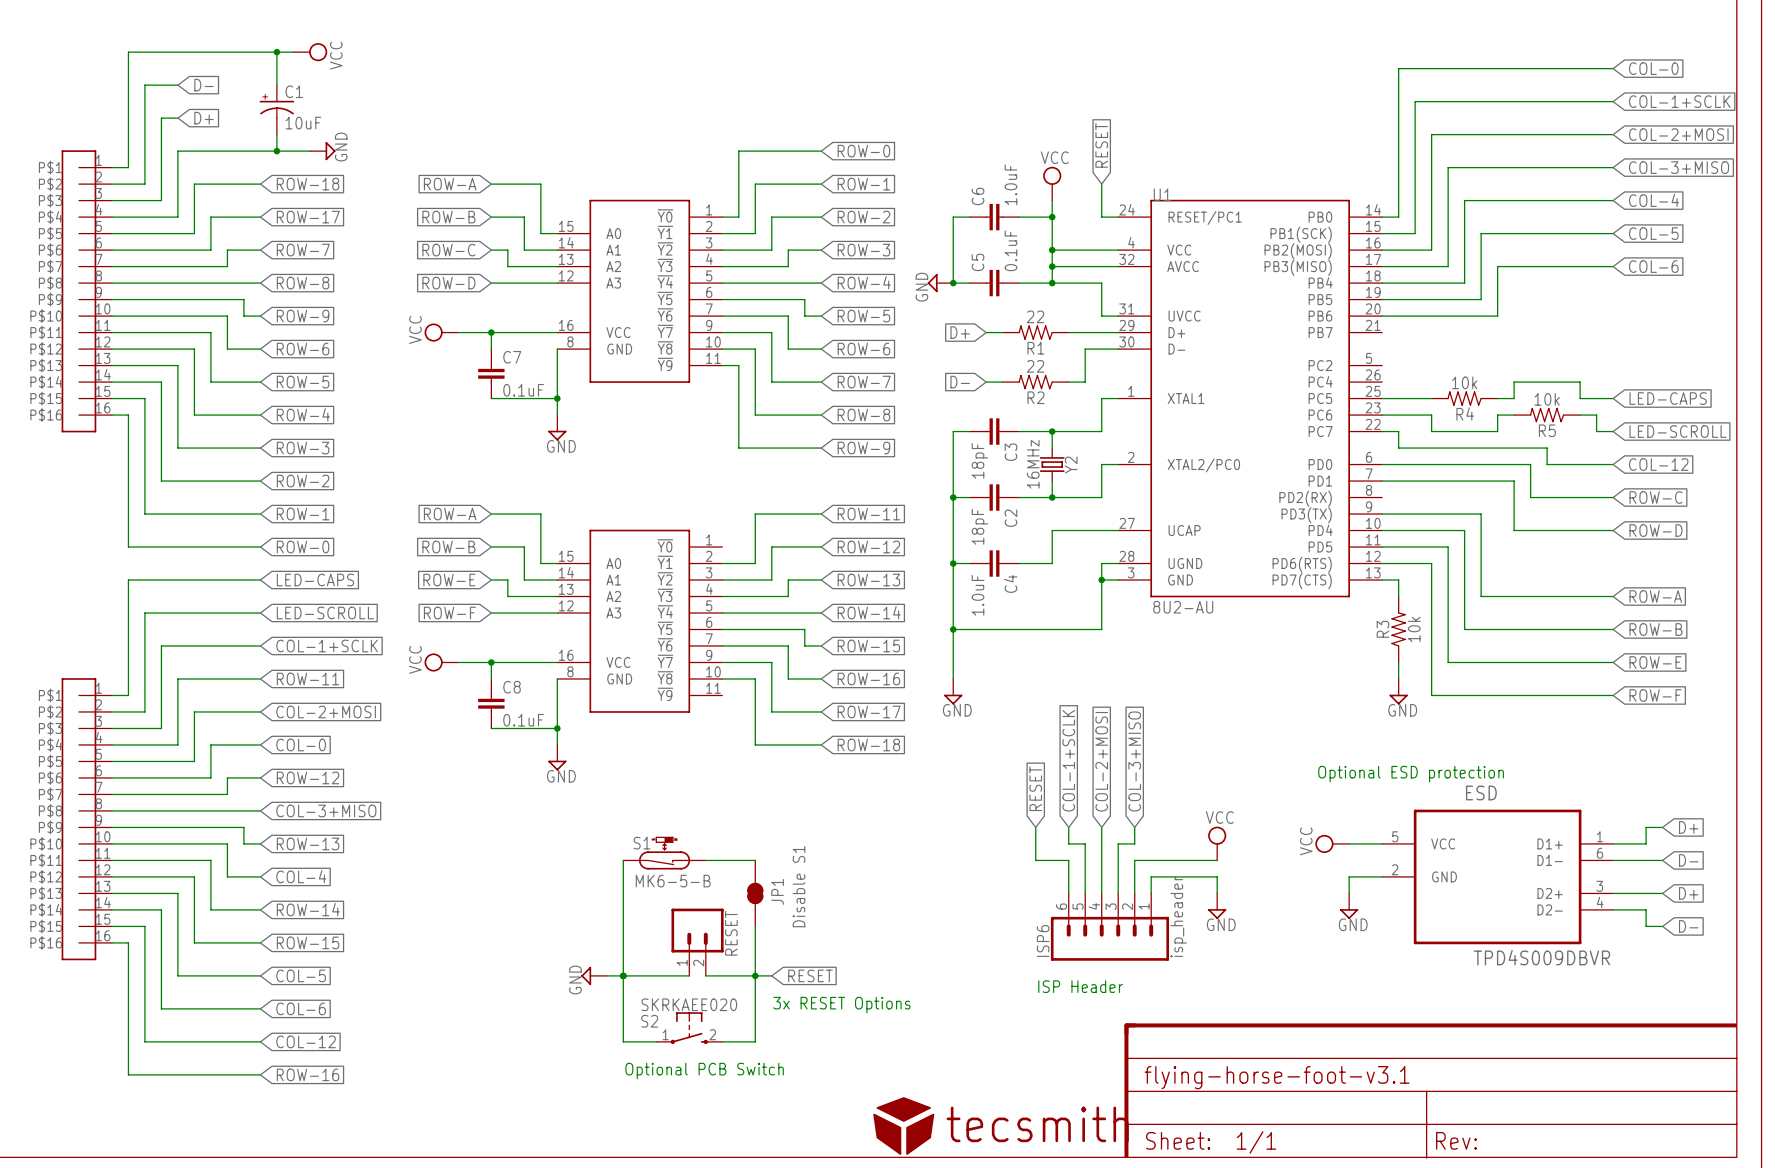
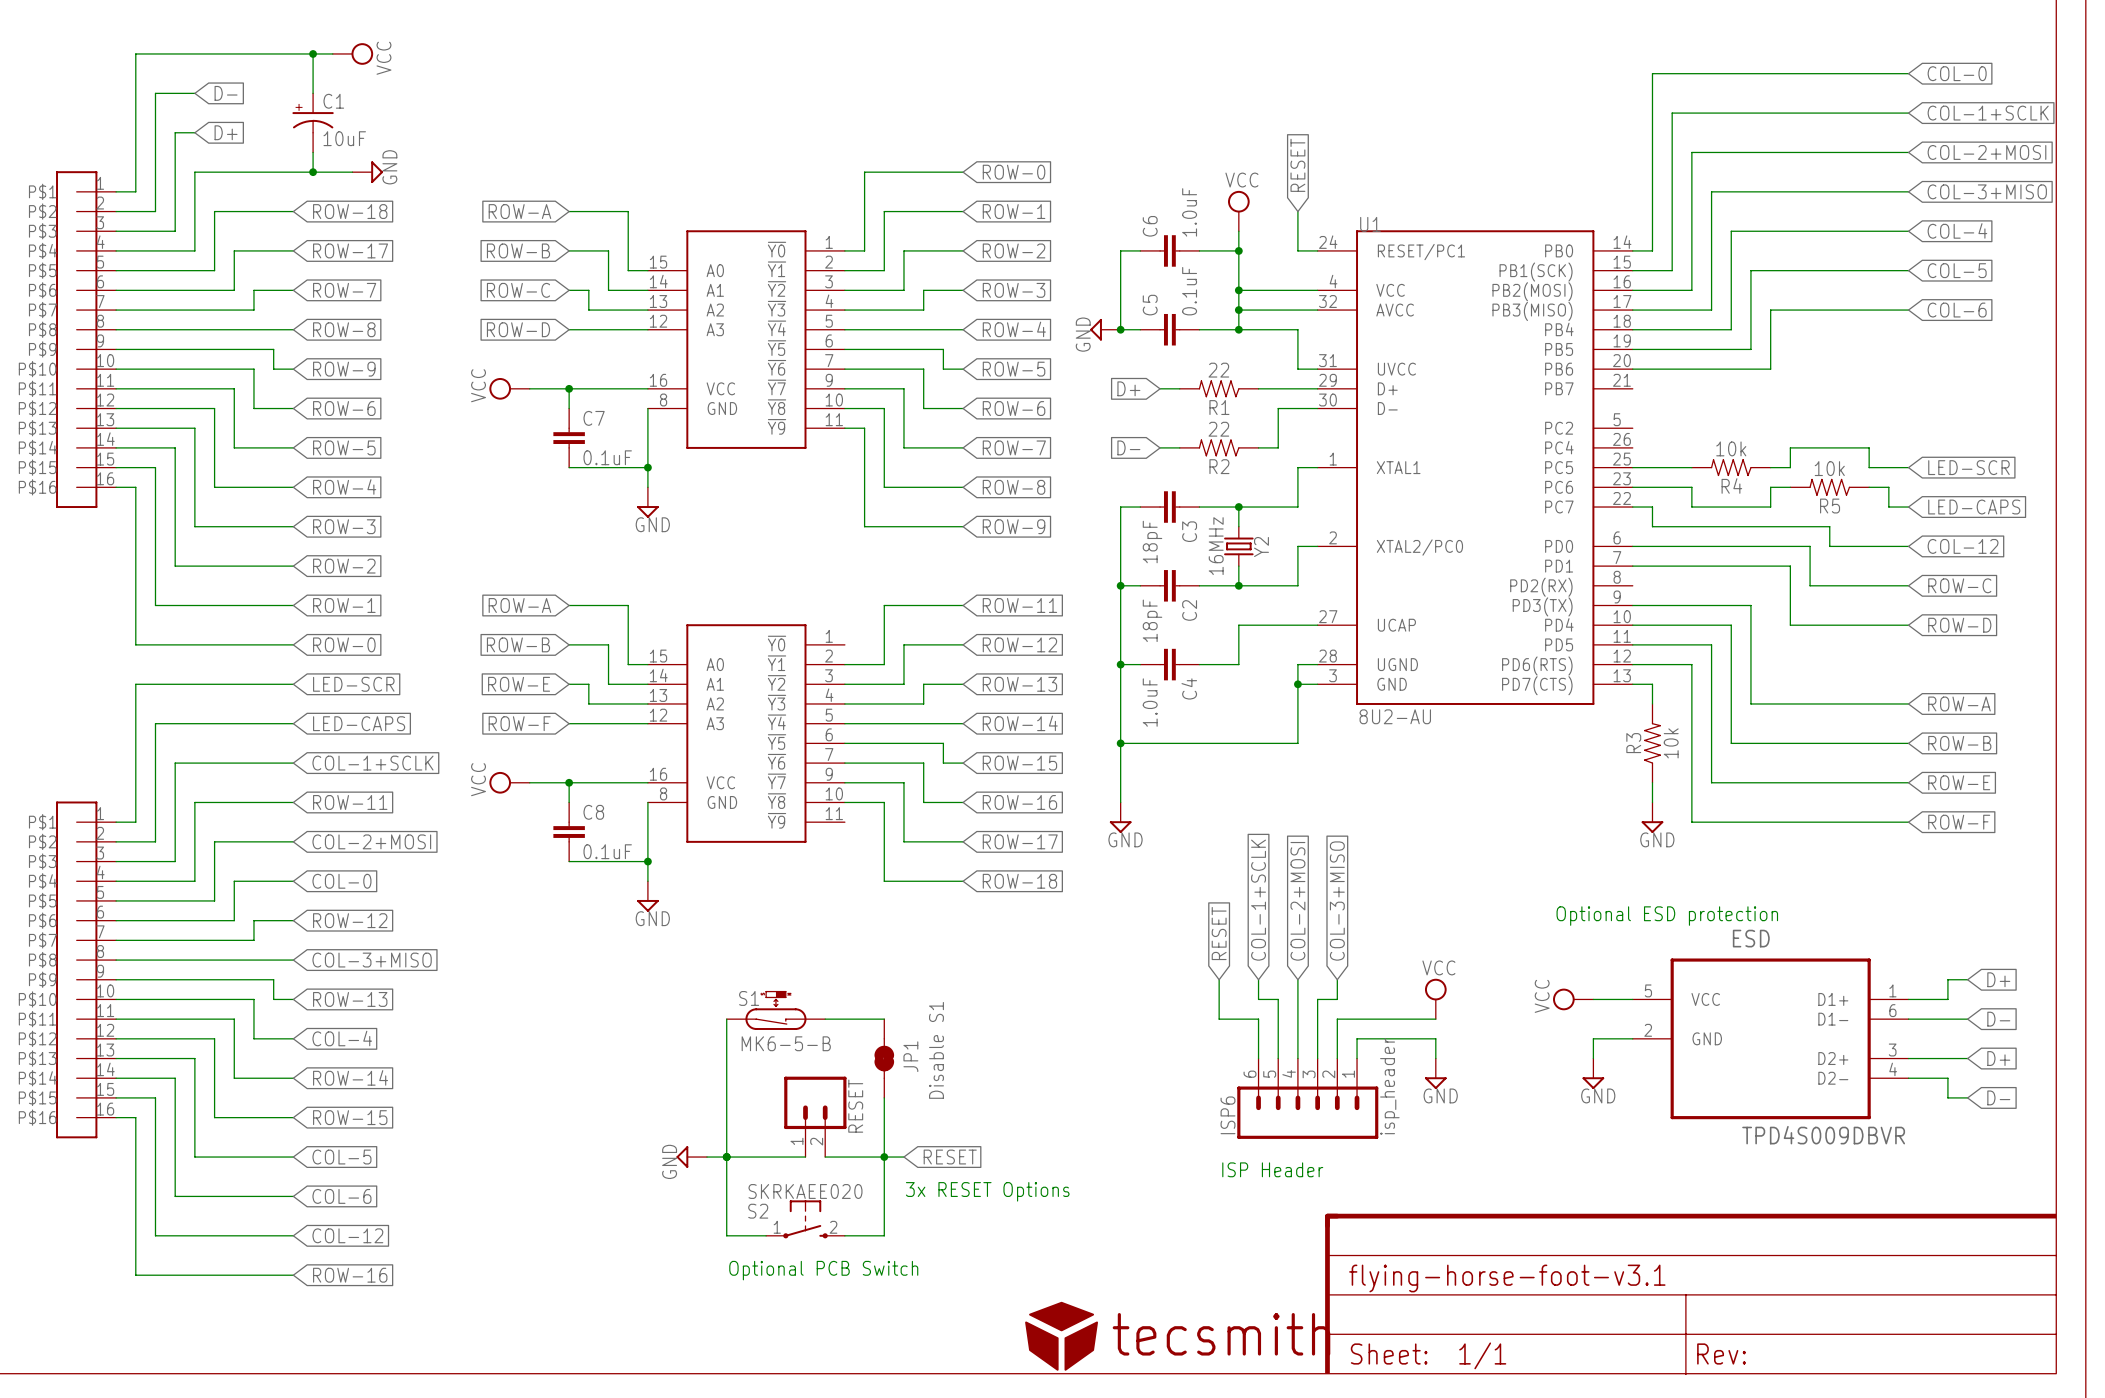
global label: LED-CAPS (1668, 398) -> LED-SCR (1968, 467)
global label: LED-SCROLL (1678, 431) -> LED-CAPS (1974, 507)
global label: LED-CAPS (315, 580) -> LED-SCR (353, 684)
global label: LED-SCROLL (325, 613) -> LED-CAPS (359, 723)

